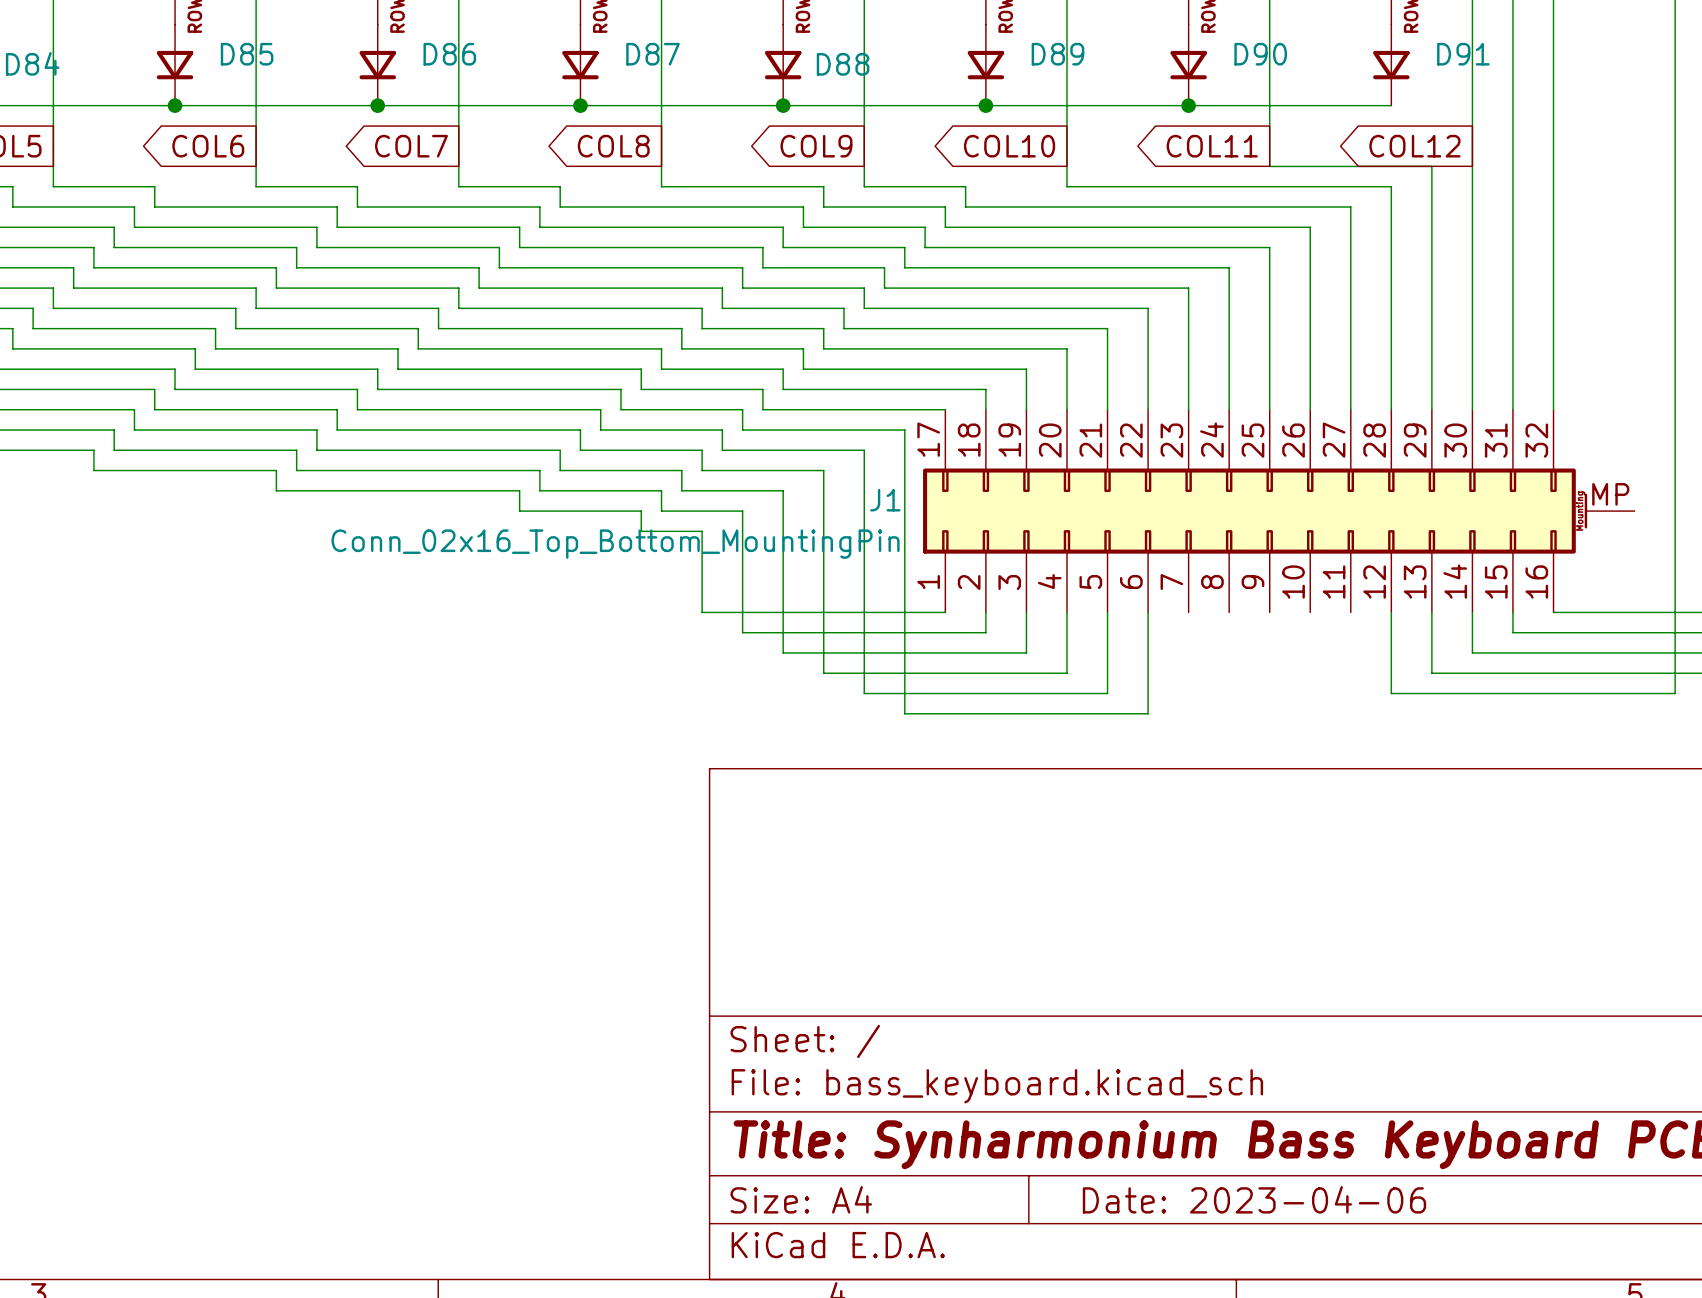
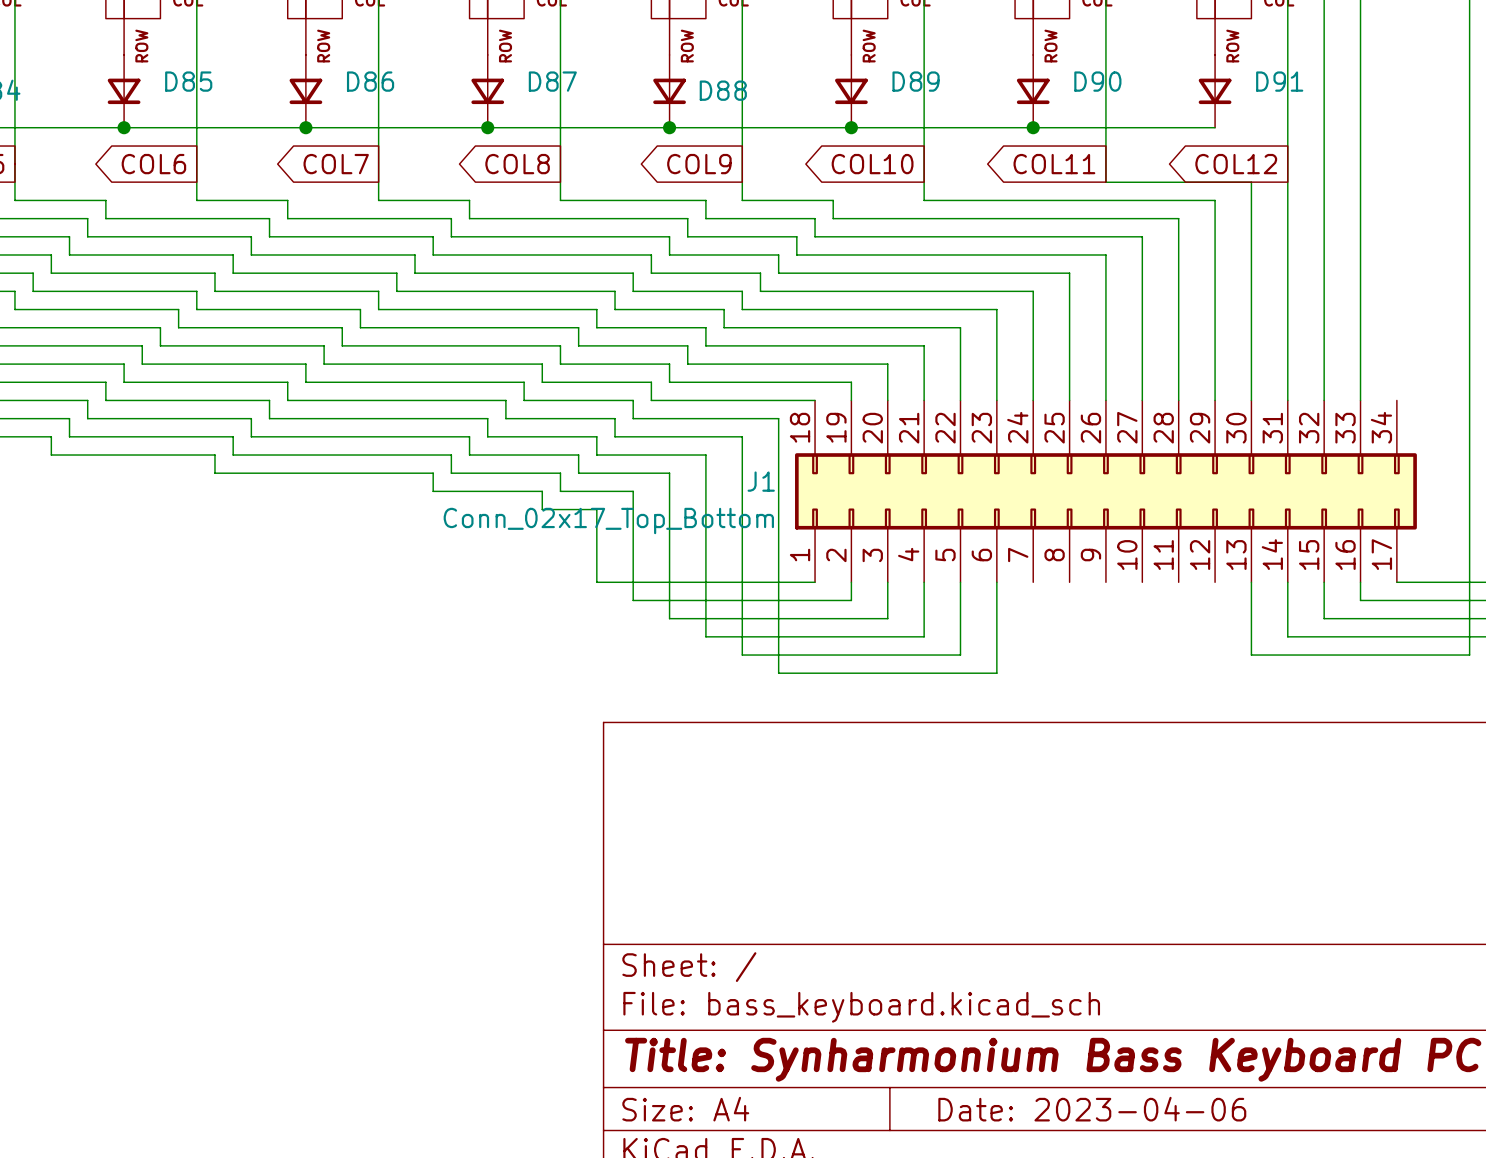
J1 symbol: [923, 409, 1635, 613] -> [795, 400, 1417, 583]
J1 value: Conn_02x16_Top_Bottom_MountingPin (615, 544) -> Conn_02x17_Top_Bottom (608, 521)
wire: (1391, 612) (1391, 693) (1431, 693) -> none
wire: (1553, 612) (1594, 612) -> (1360, 582) (1360, 600)
wire: (1512, 632) (1553, 632) -> (1324, 600) (1324, 618)
wire: (1472, 652) (1512, 652) -> (1287, 618) (1287, 636)
wire: (1431, 673) (1472, 673) -> (1251, 636) (1251, 655)

